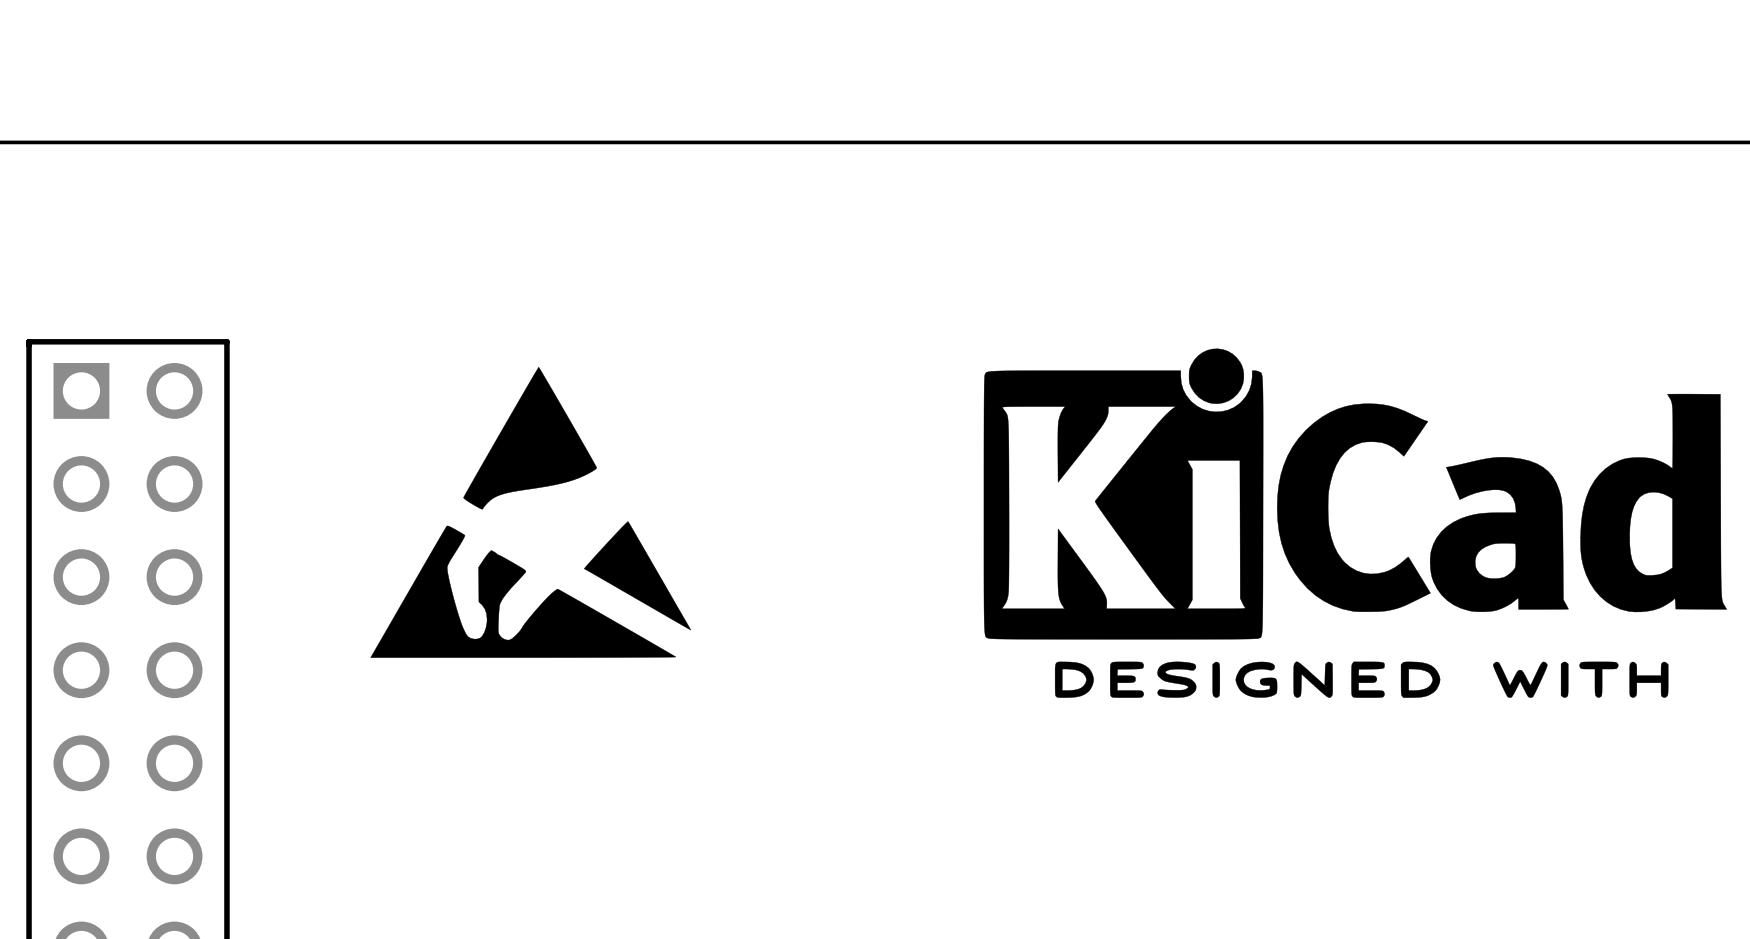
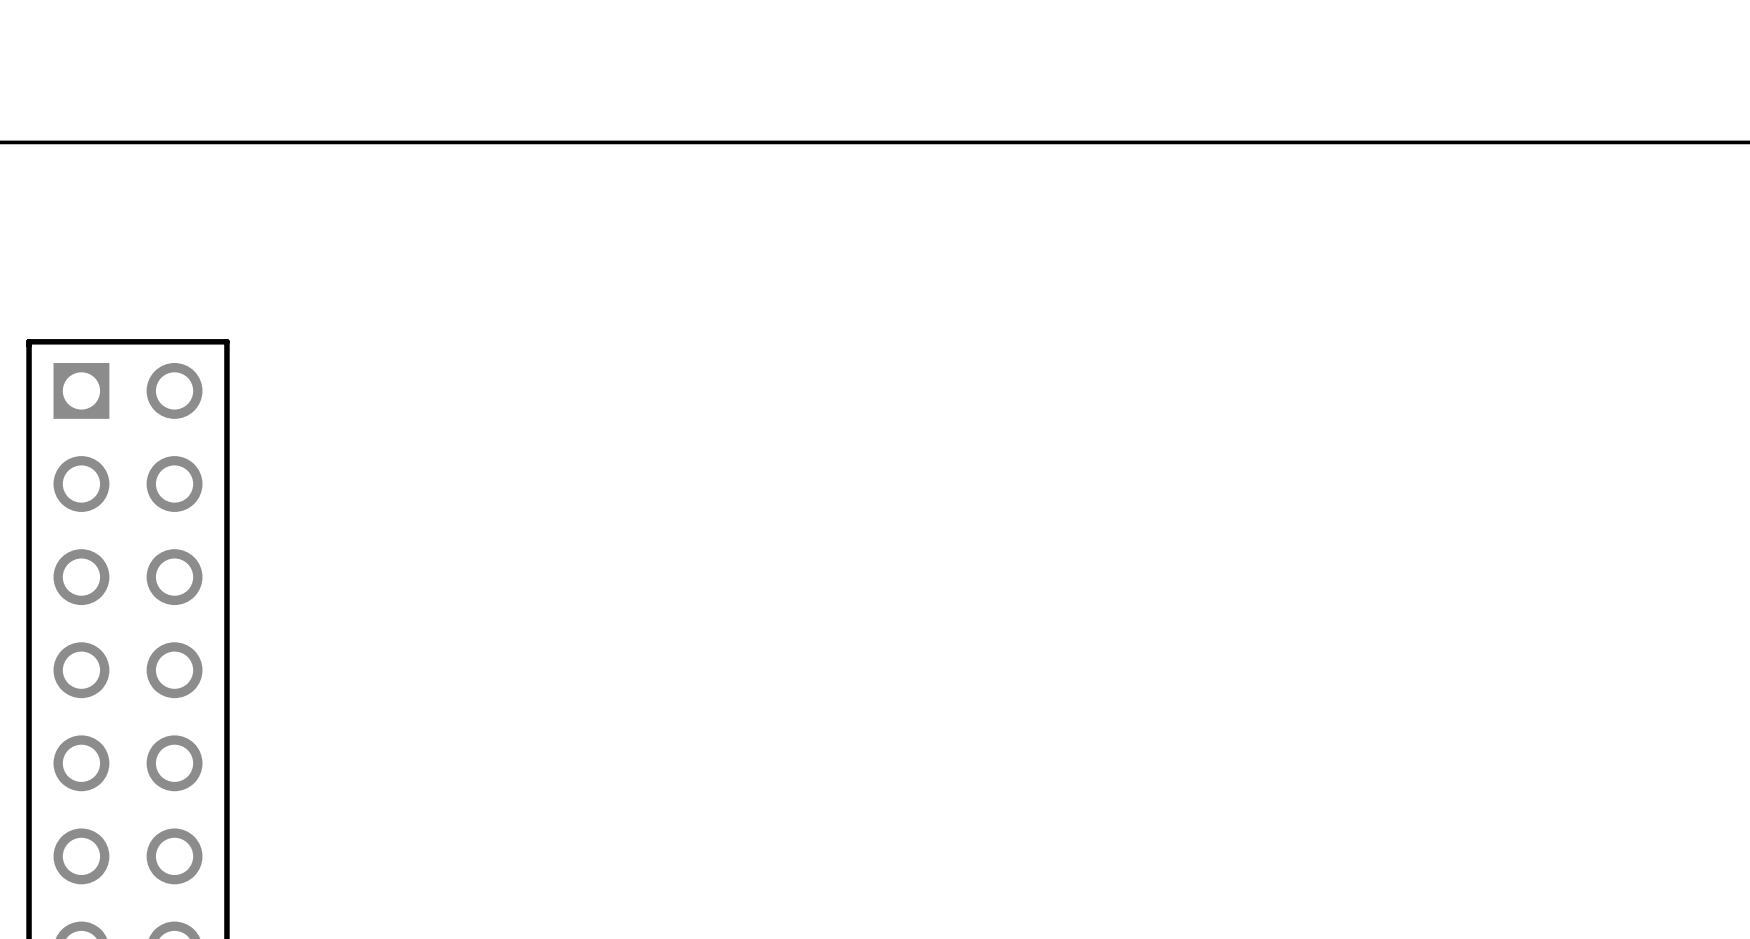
drawing: [983, 348, 1727, 698] -> none
drawing: [370, 367, 691, 658] -> none

